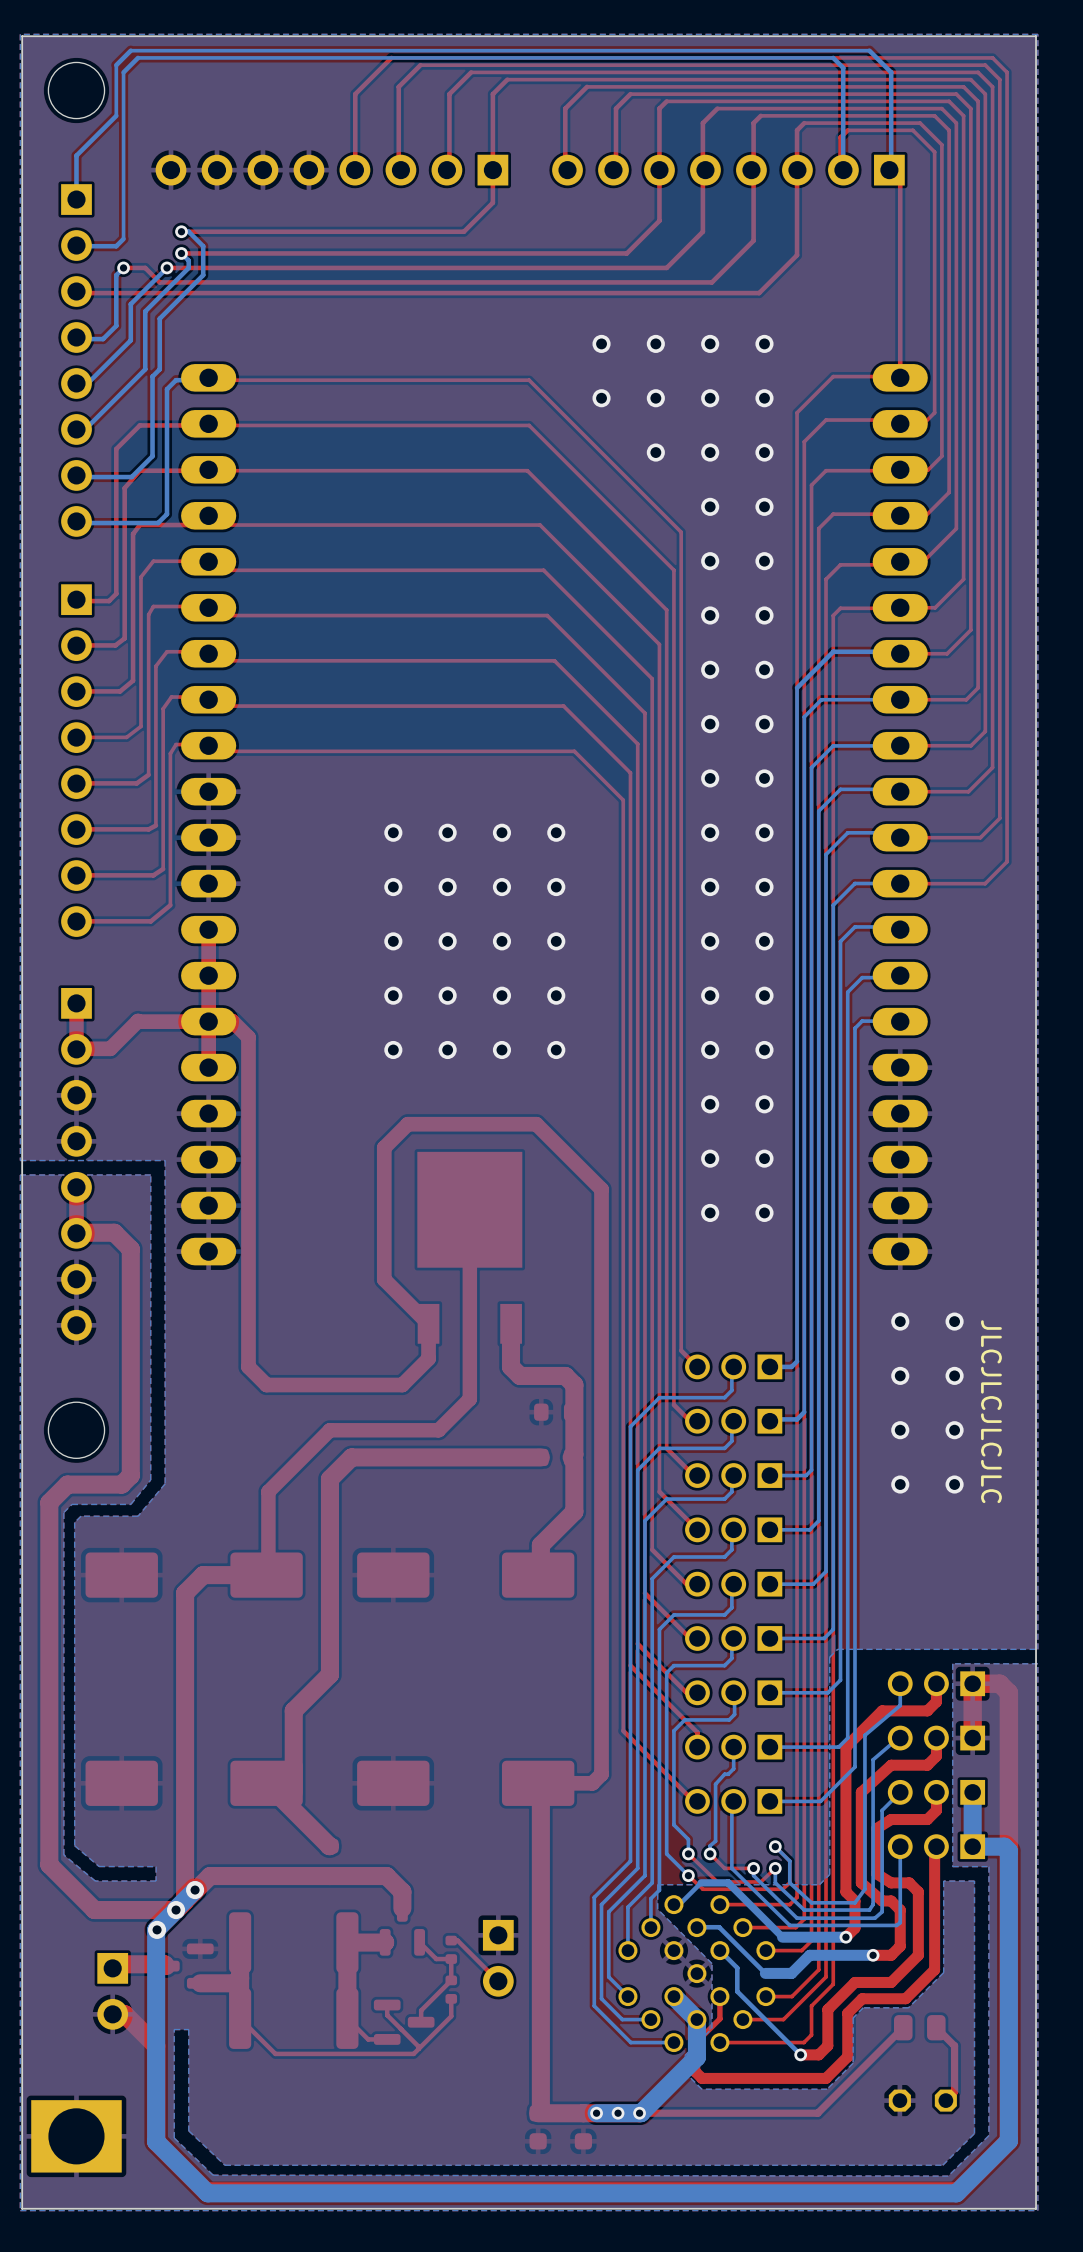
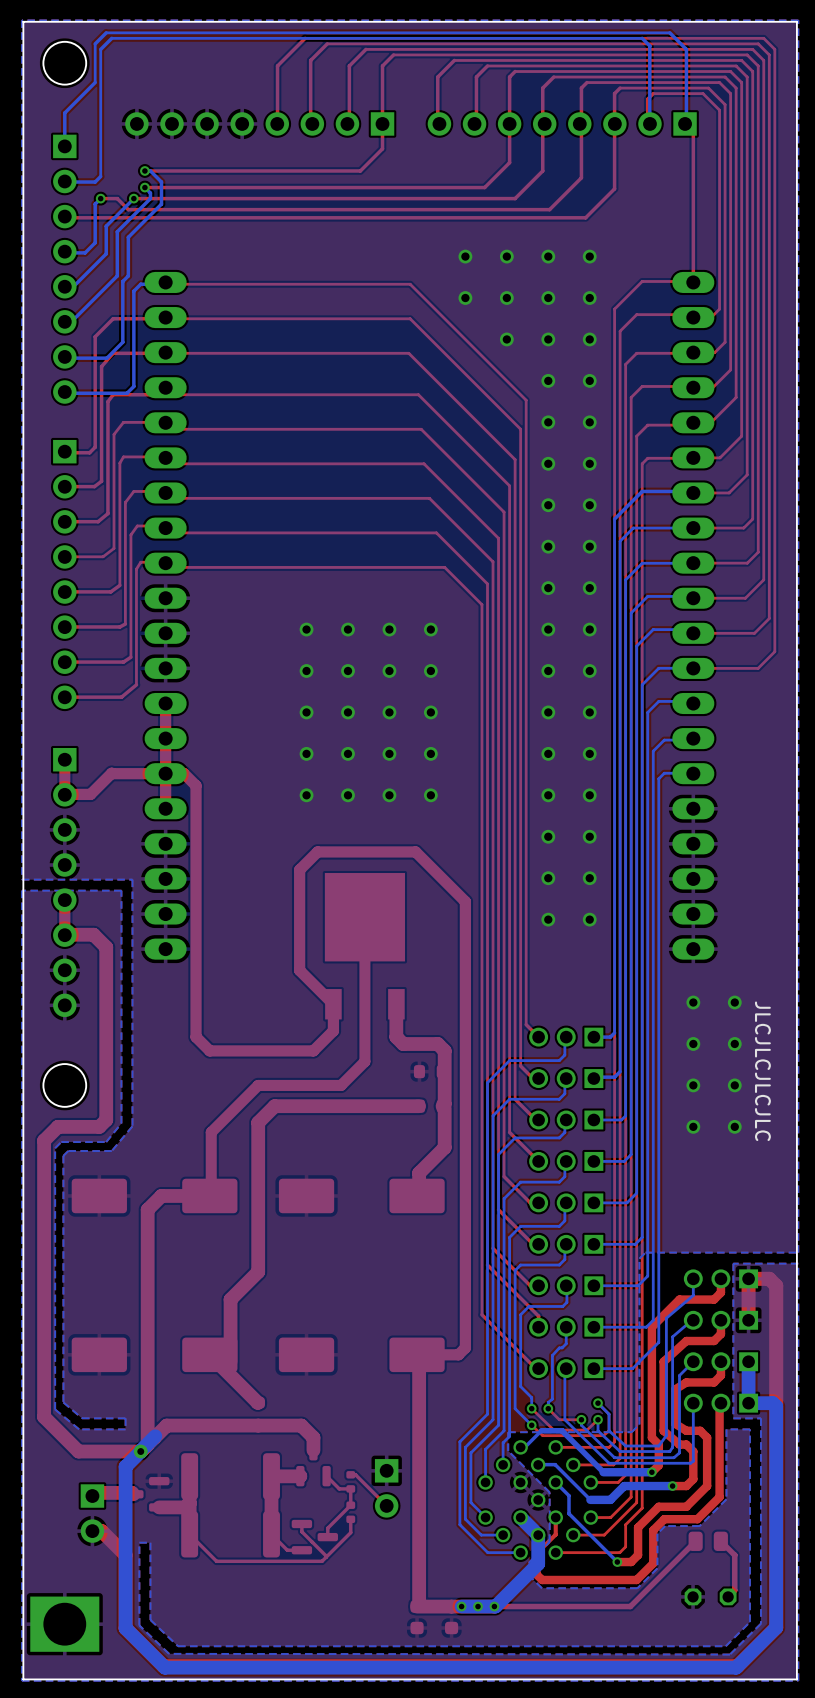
via: (195, 1890) -> none
via: (157, 1929) -> none

